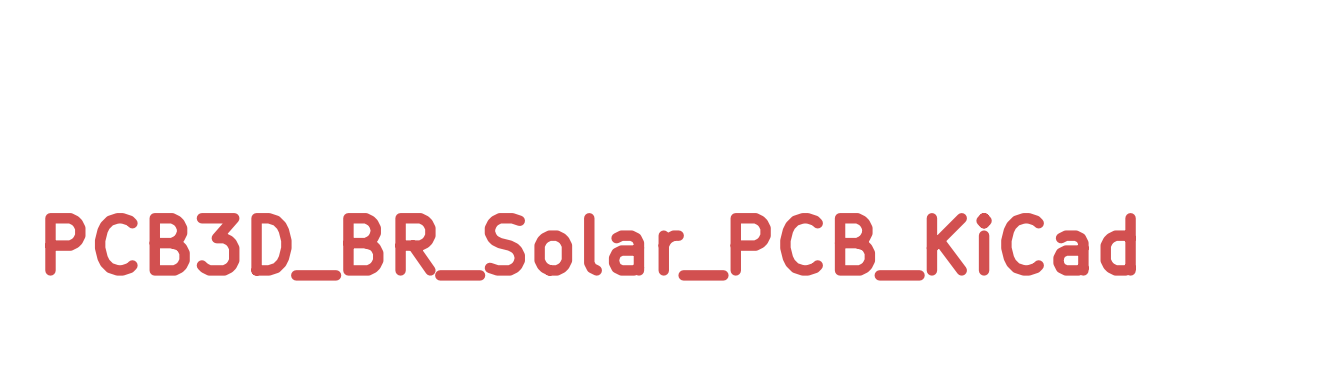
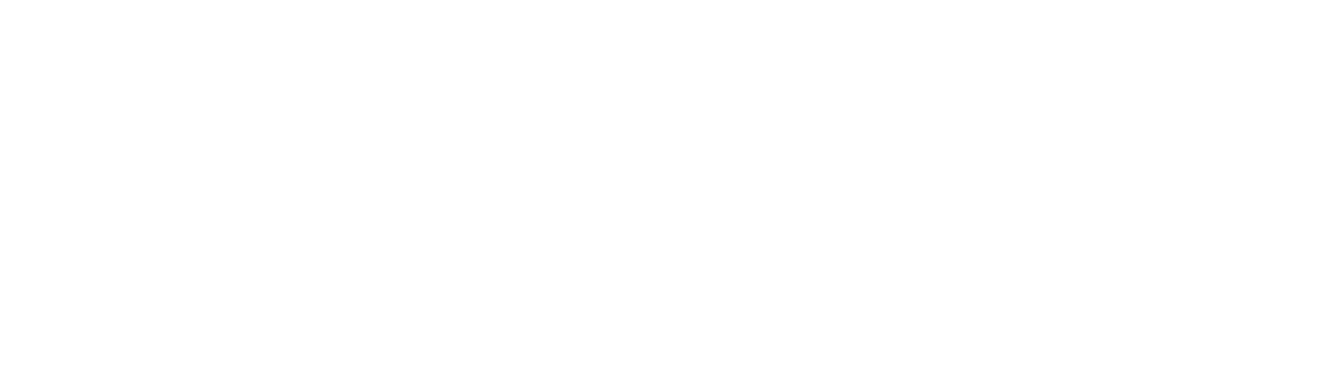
text: PCB3D_BR_Solar_PCB_KiCad (590, 246) -> none

